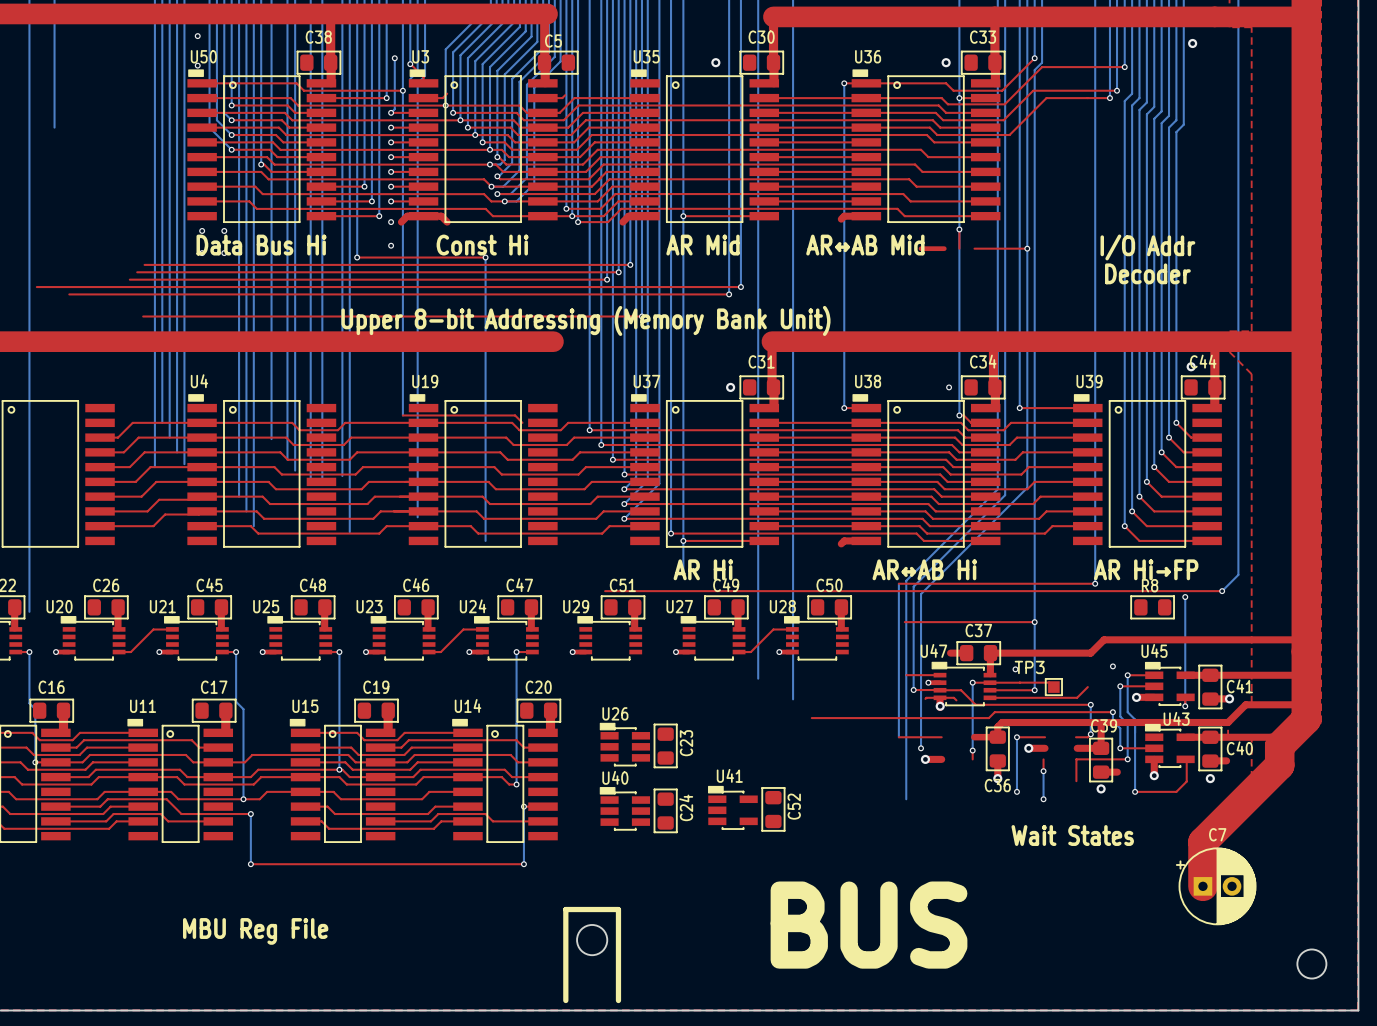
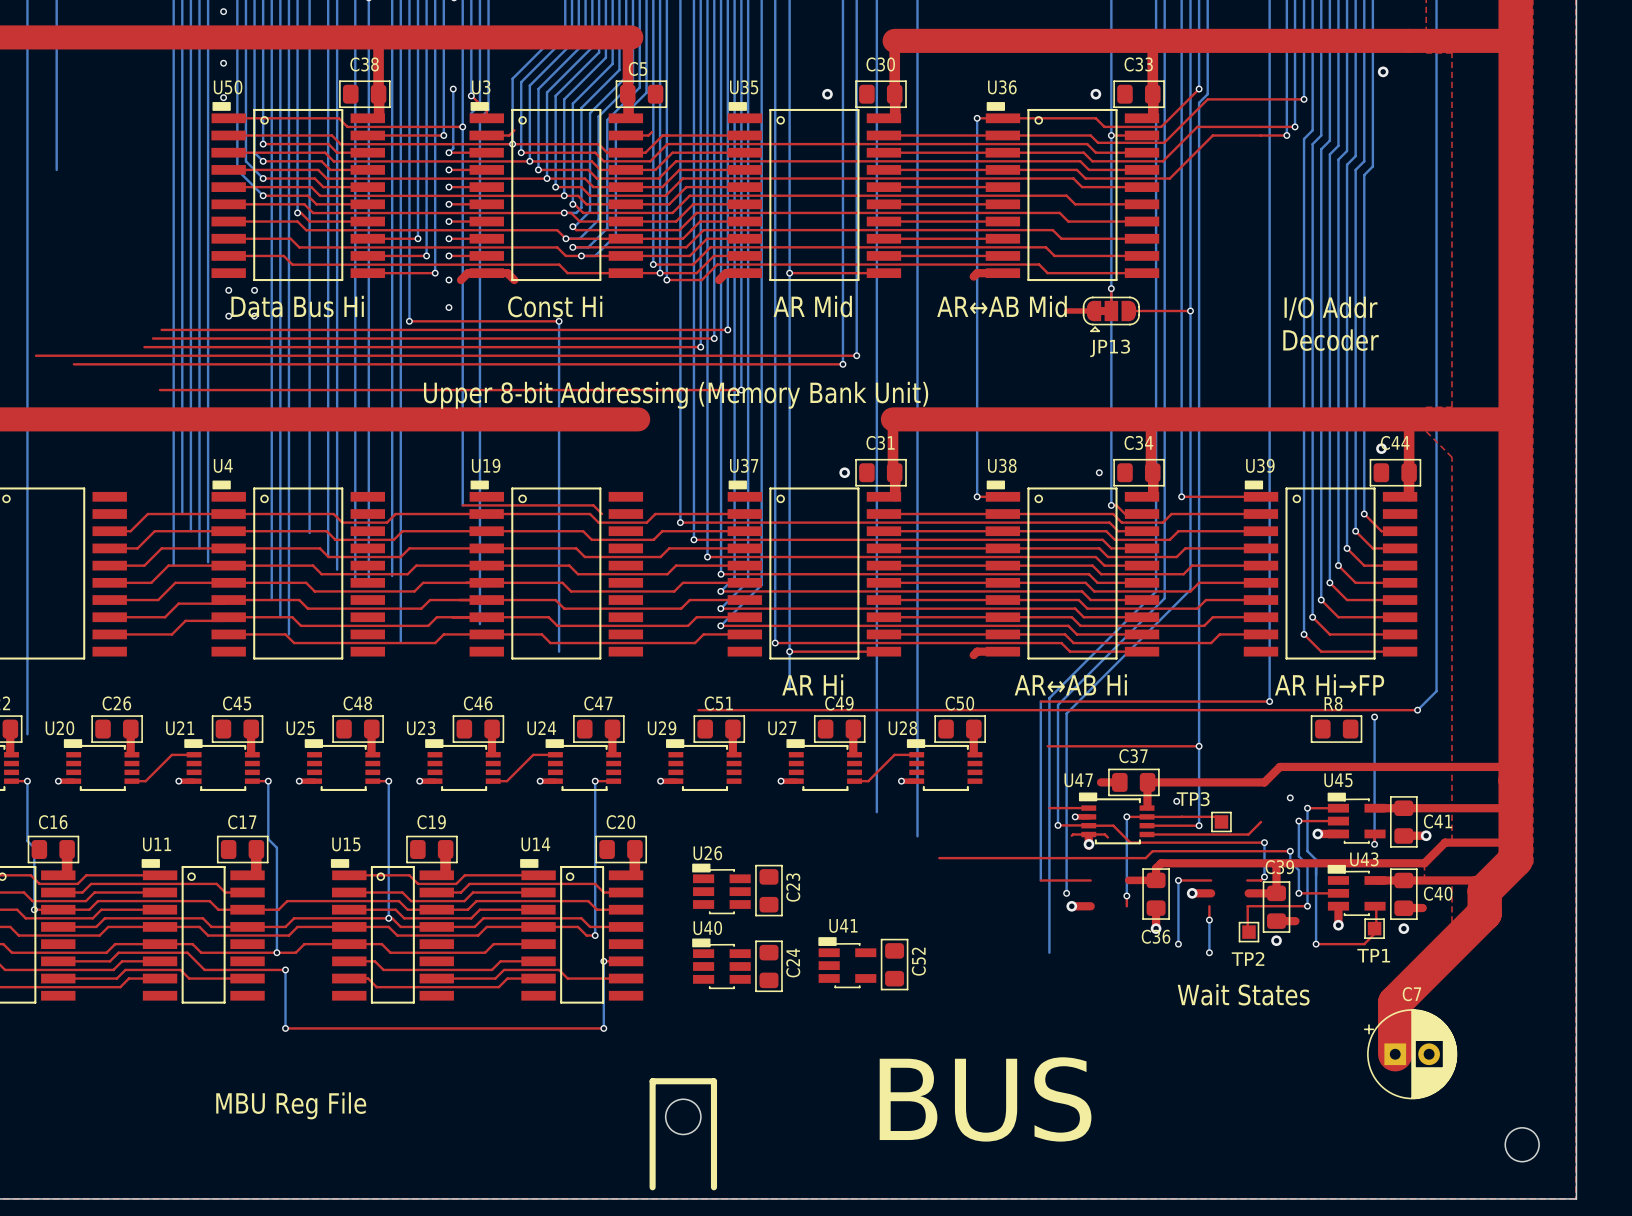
JP13: none -> (1111, 314)
TP1: none -> (1374, 928)
TP2: none -> (1248, 932)

